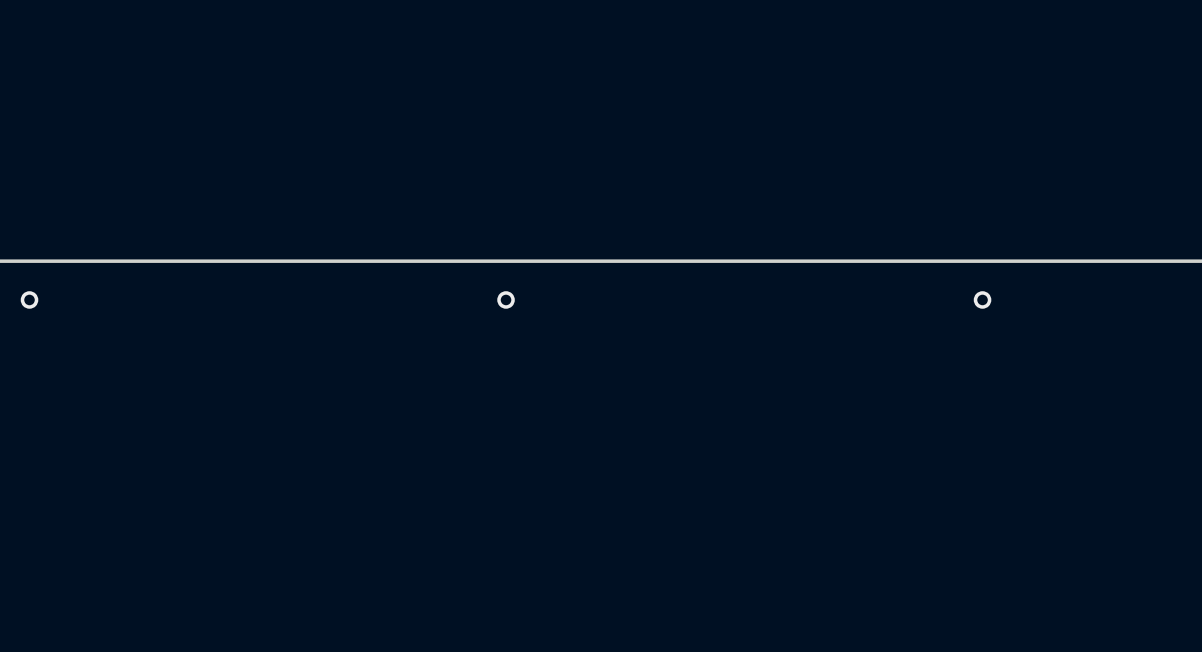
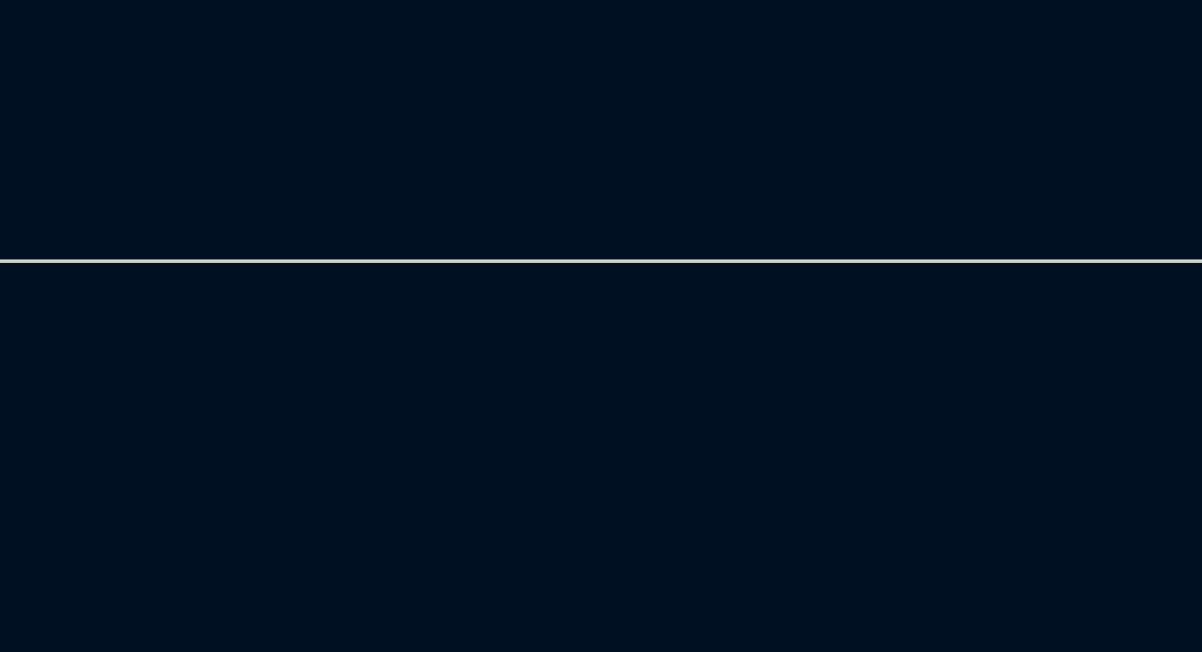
via: (29, 299) -> none
via: (506, 299) -> none
via: (982, 299) -> none

